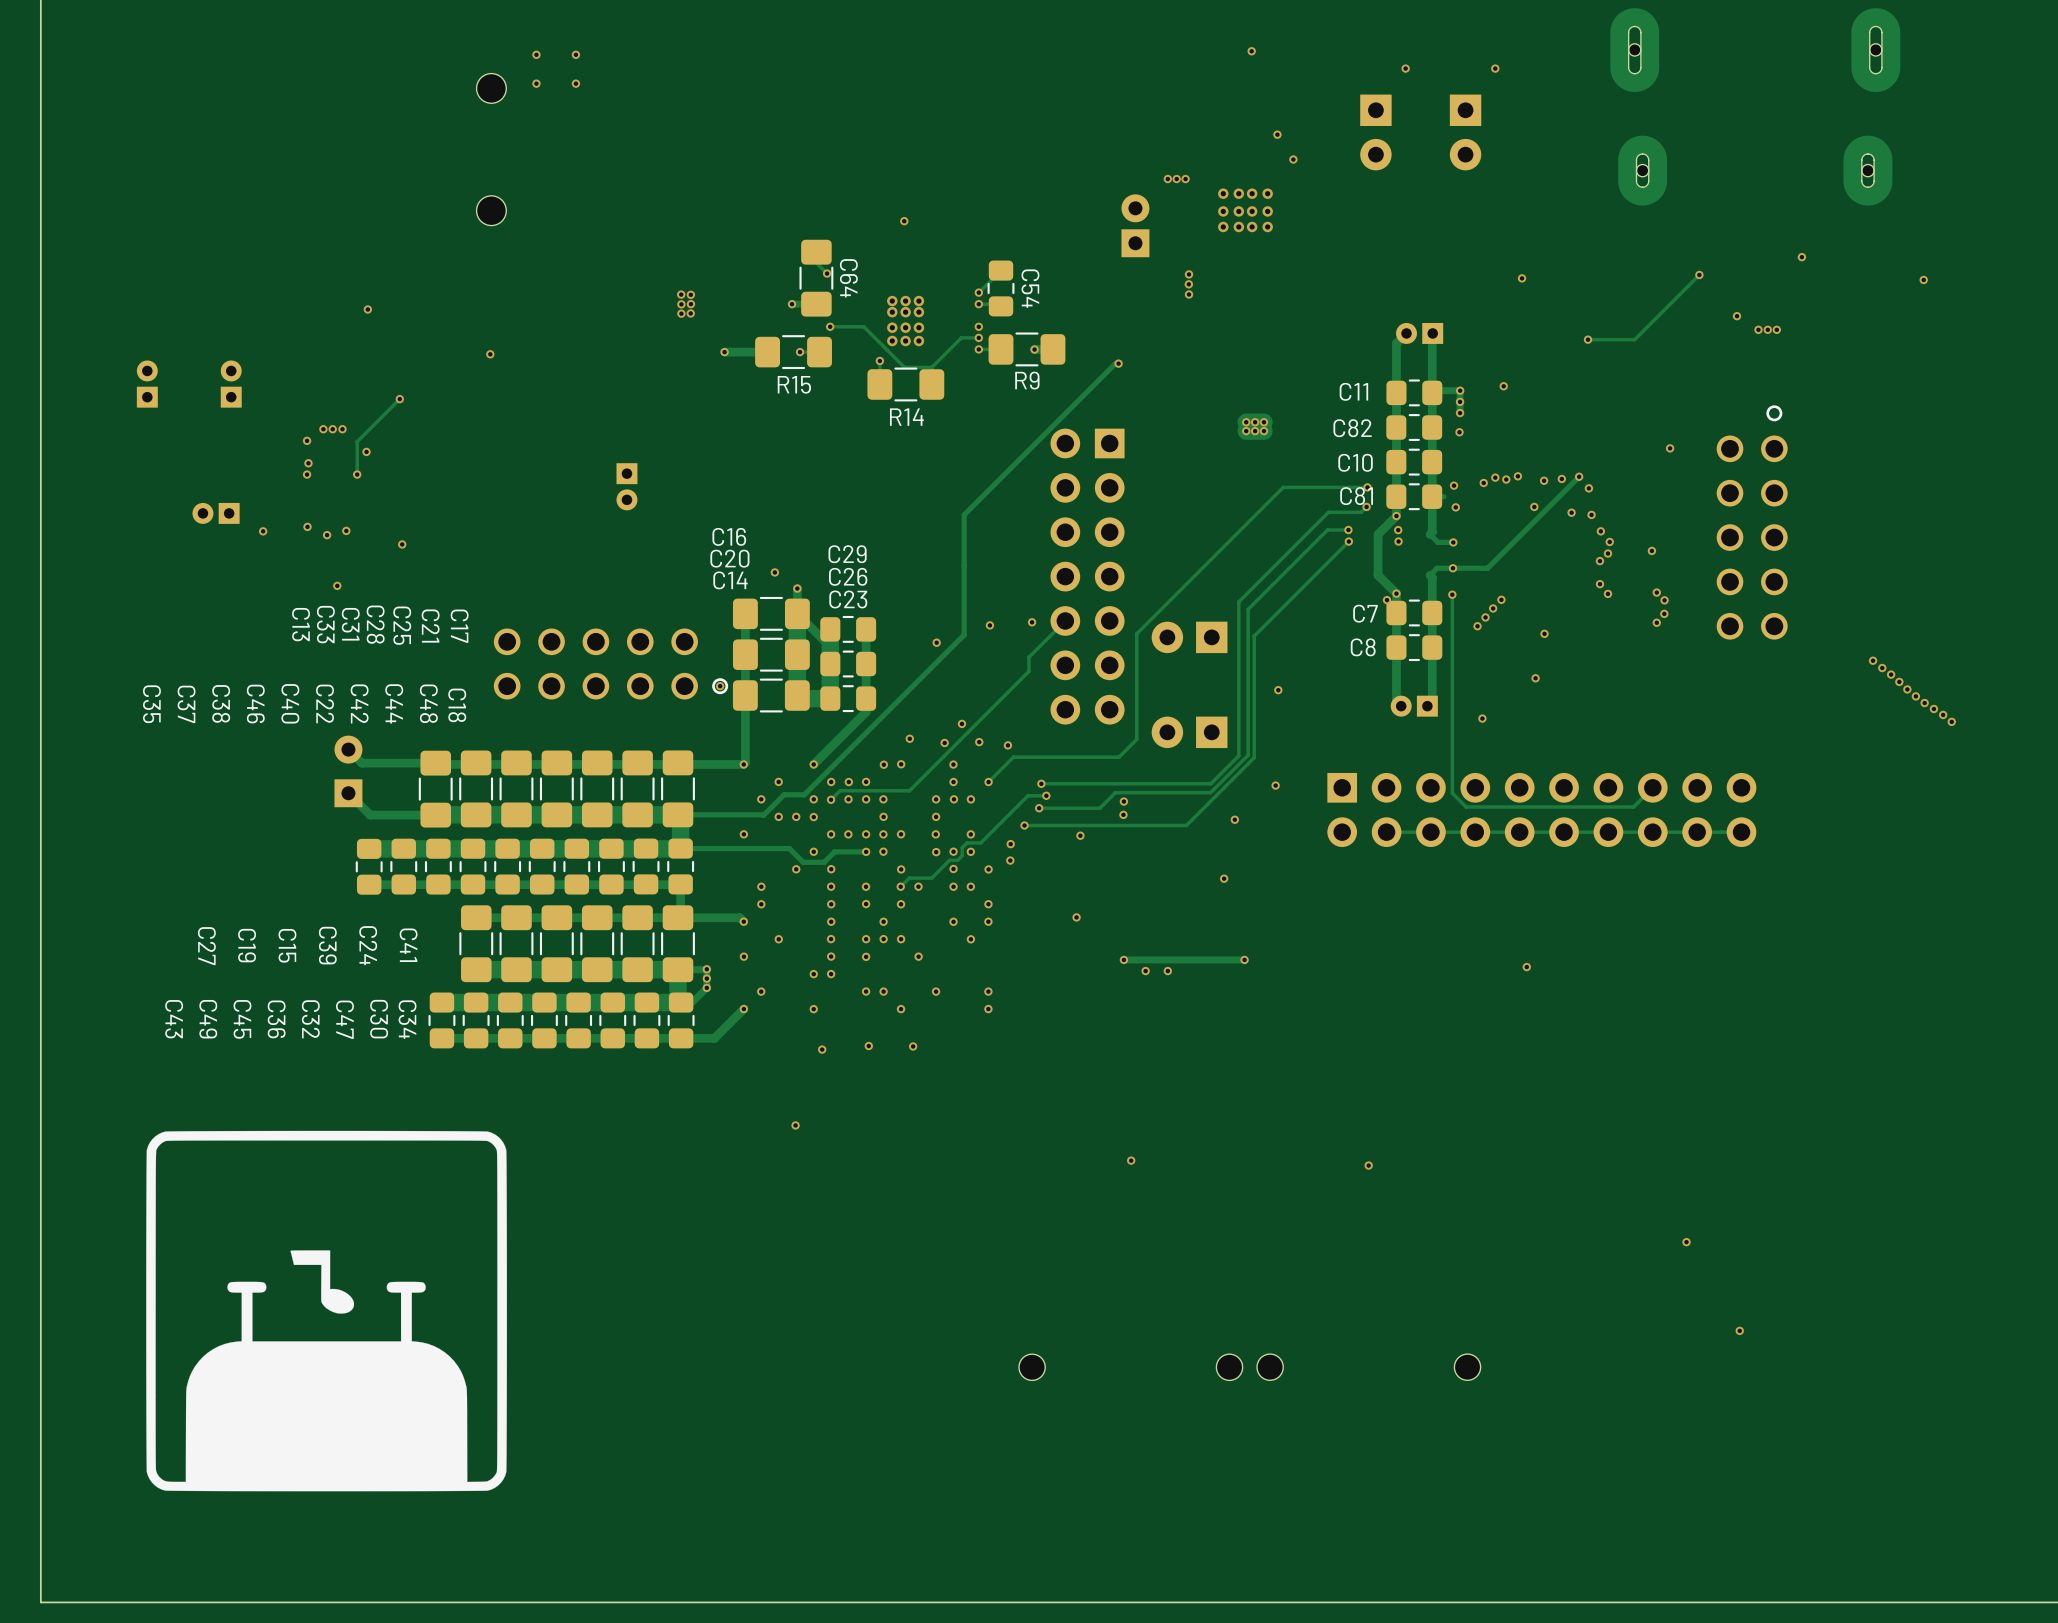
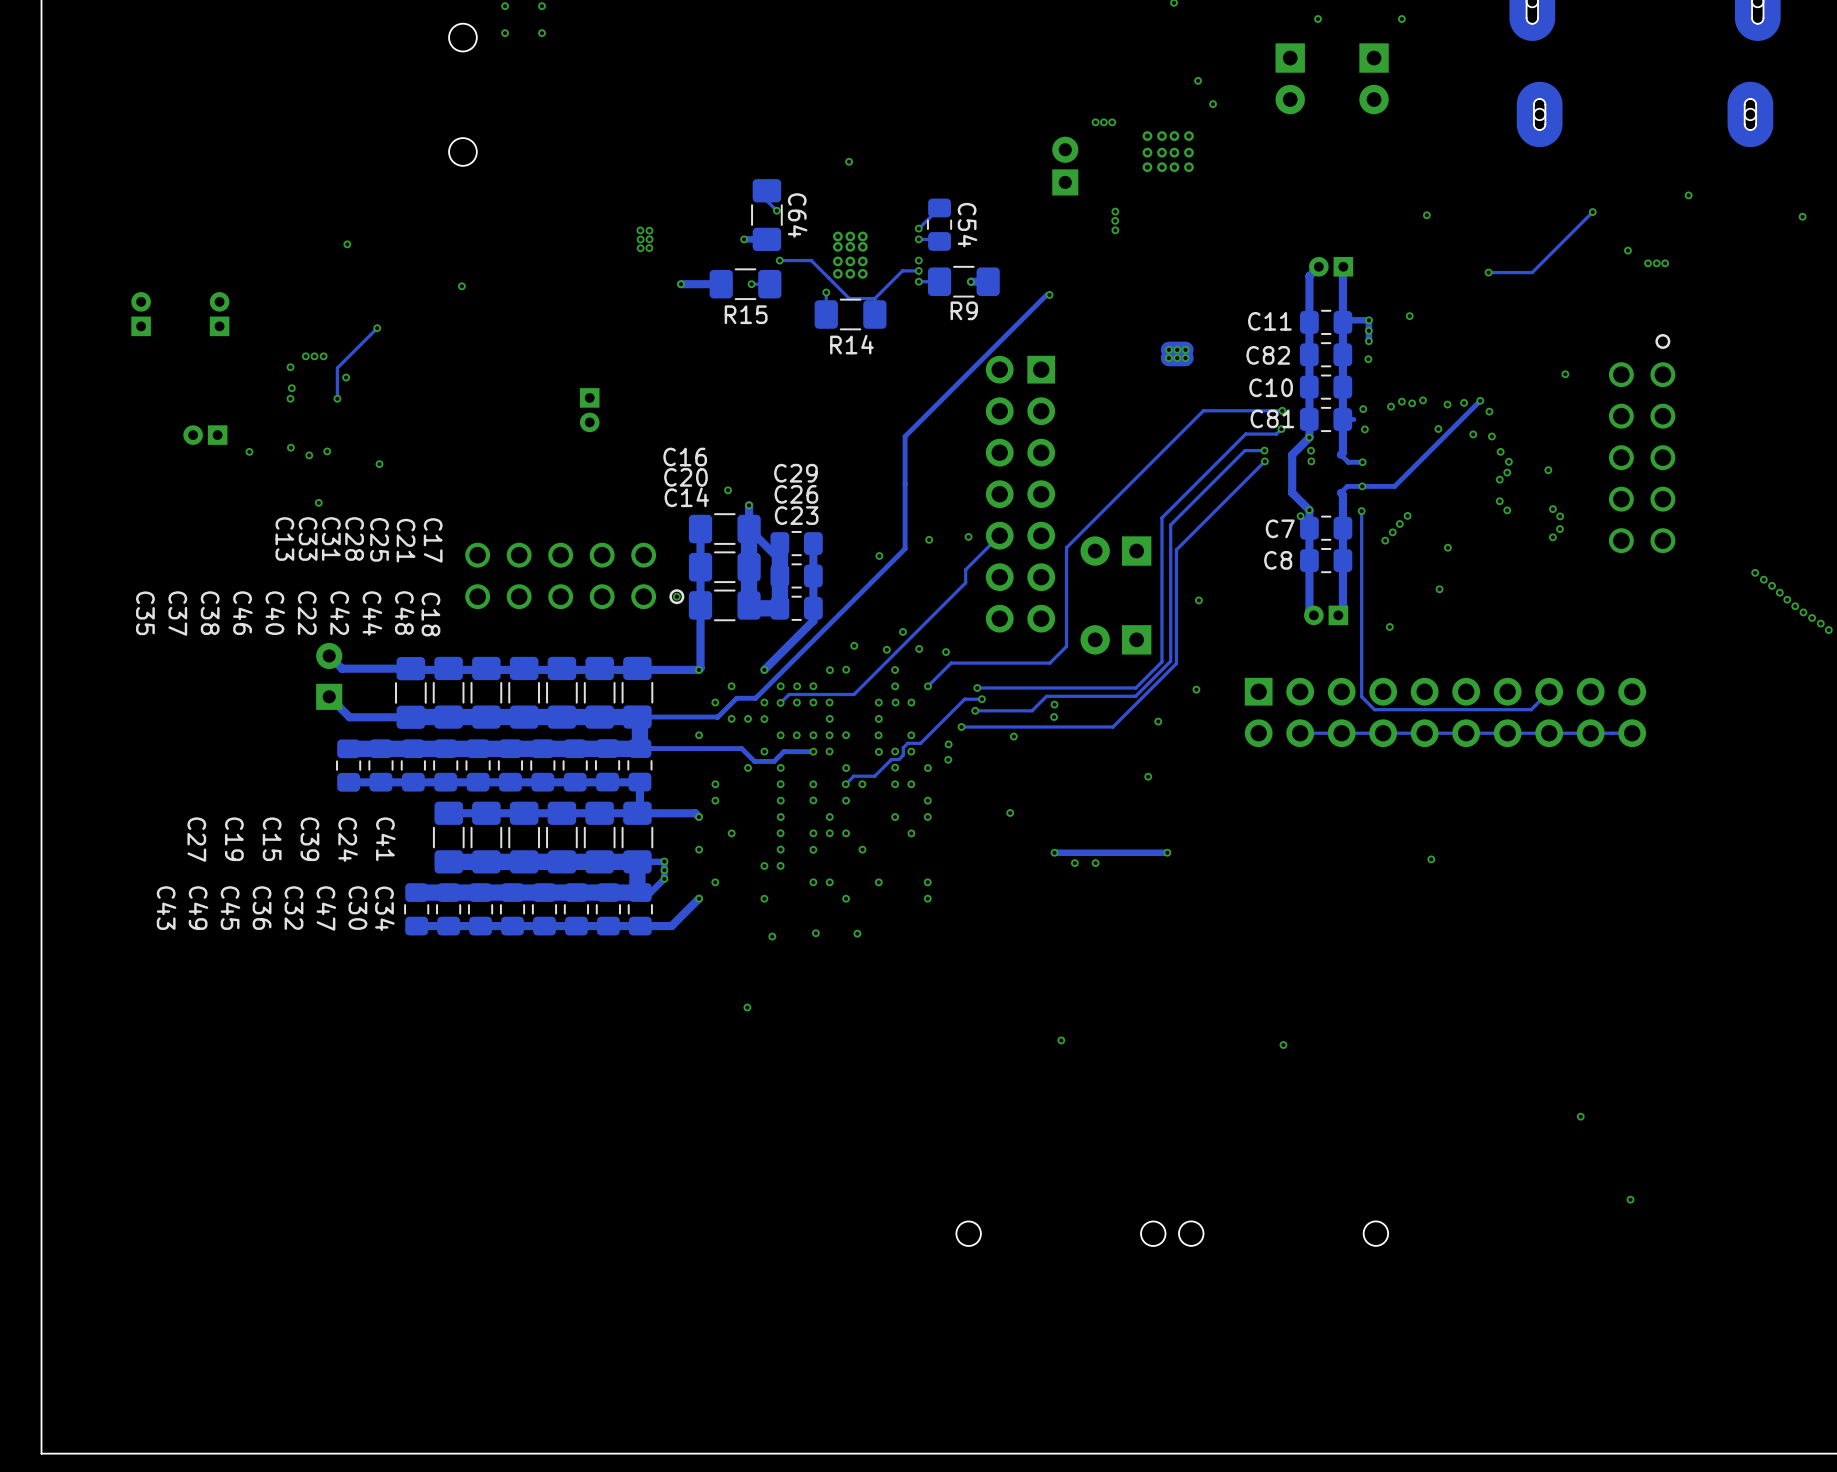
drawing: [146, 1130, 507, 1492] -> none

